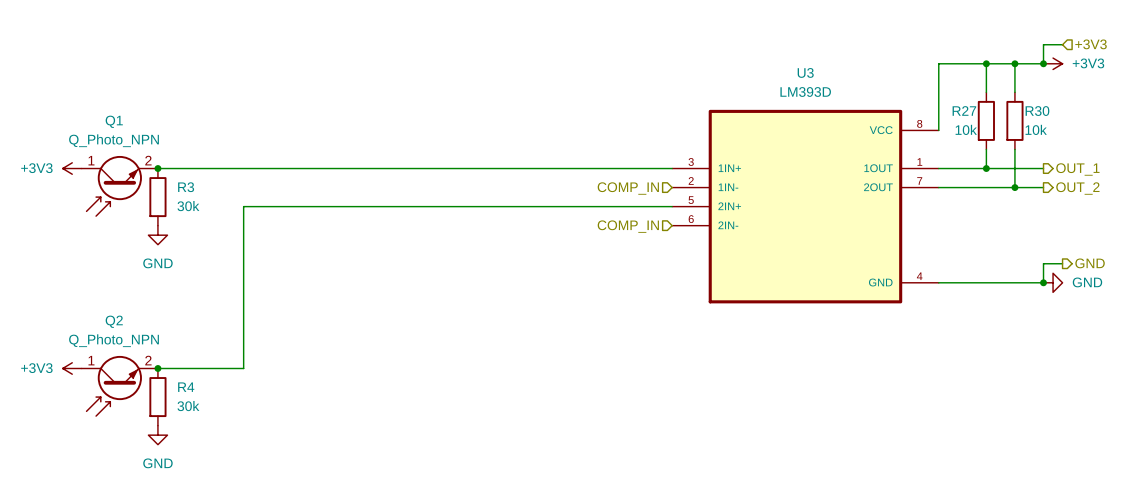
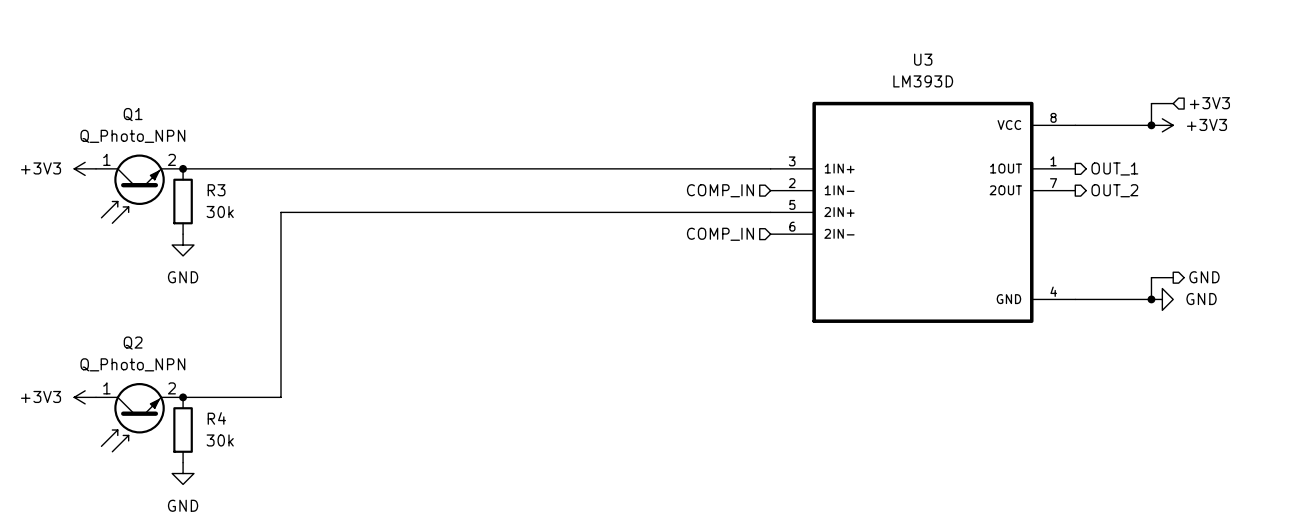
wire: (1062, 44) (1043, 44) (1043, 63) (938, 63) (938, 130) -> (1173, 103) (1151, 103) (1151, 125) (1075, 125)
hierarchical label position: +3V3 (1091, 44) -> +3V3 (1209, 103)
wire: (986, 63) (986, 92) -> none
junction: (986, 63) -> none
wire: (1014, 63) (1014, 92) -> none
junction: (1014, 63) -> none
junction: (1043, 63) -> none
power symbol position: +3V3 (1053, 63) -> +3V3 (1162, 125)
R27: 10k (986, 120) -> none
R30: 10k (1014, 120) -> none
junction: none -> (1151, 125)
wire: (986, 149) (986, 168) -> none
wire: (1014, 149) (1014, 187) -> none
wire: (938, 168) (1043, 168) -> none
junction: (986, 168) -> none
hierarchical label position: OUT_1 (1077, 169) -> OUT_1 (1114, 168)
wire: (938, 187) (1043, 187) -> none
junction: (1014, 187) -> none
hierarchical label position: OUT_2 (1077, 188) -> OUT_2 (1114, 190)
wire: (1062, 263) (1043, 263) (1043, 282) (1005, 282) -> (1173, 277) (1151, 277) (1151, 299)
hierarchical label position: GND (1090, 263) -> GND (1204, 277)
junction position: (1043, 282) -> (1151, 299)
power symbol position: GND (1053, 282) -> GND (1162, 299)

